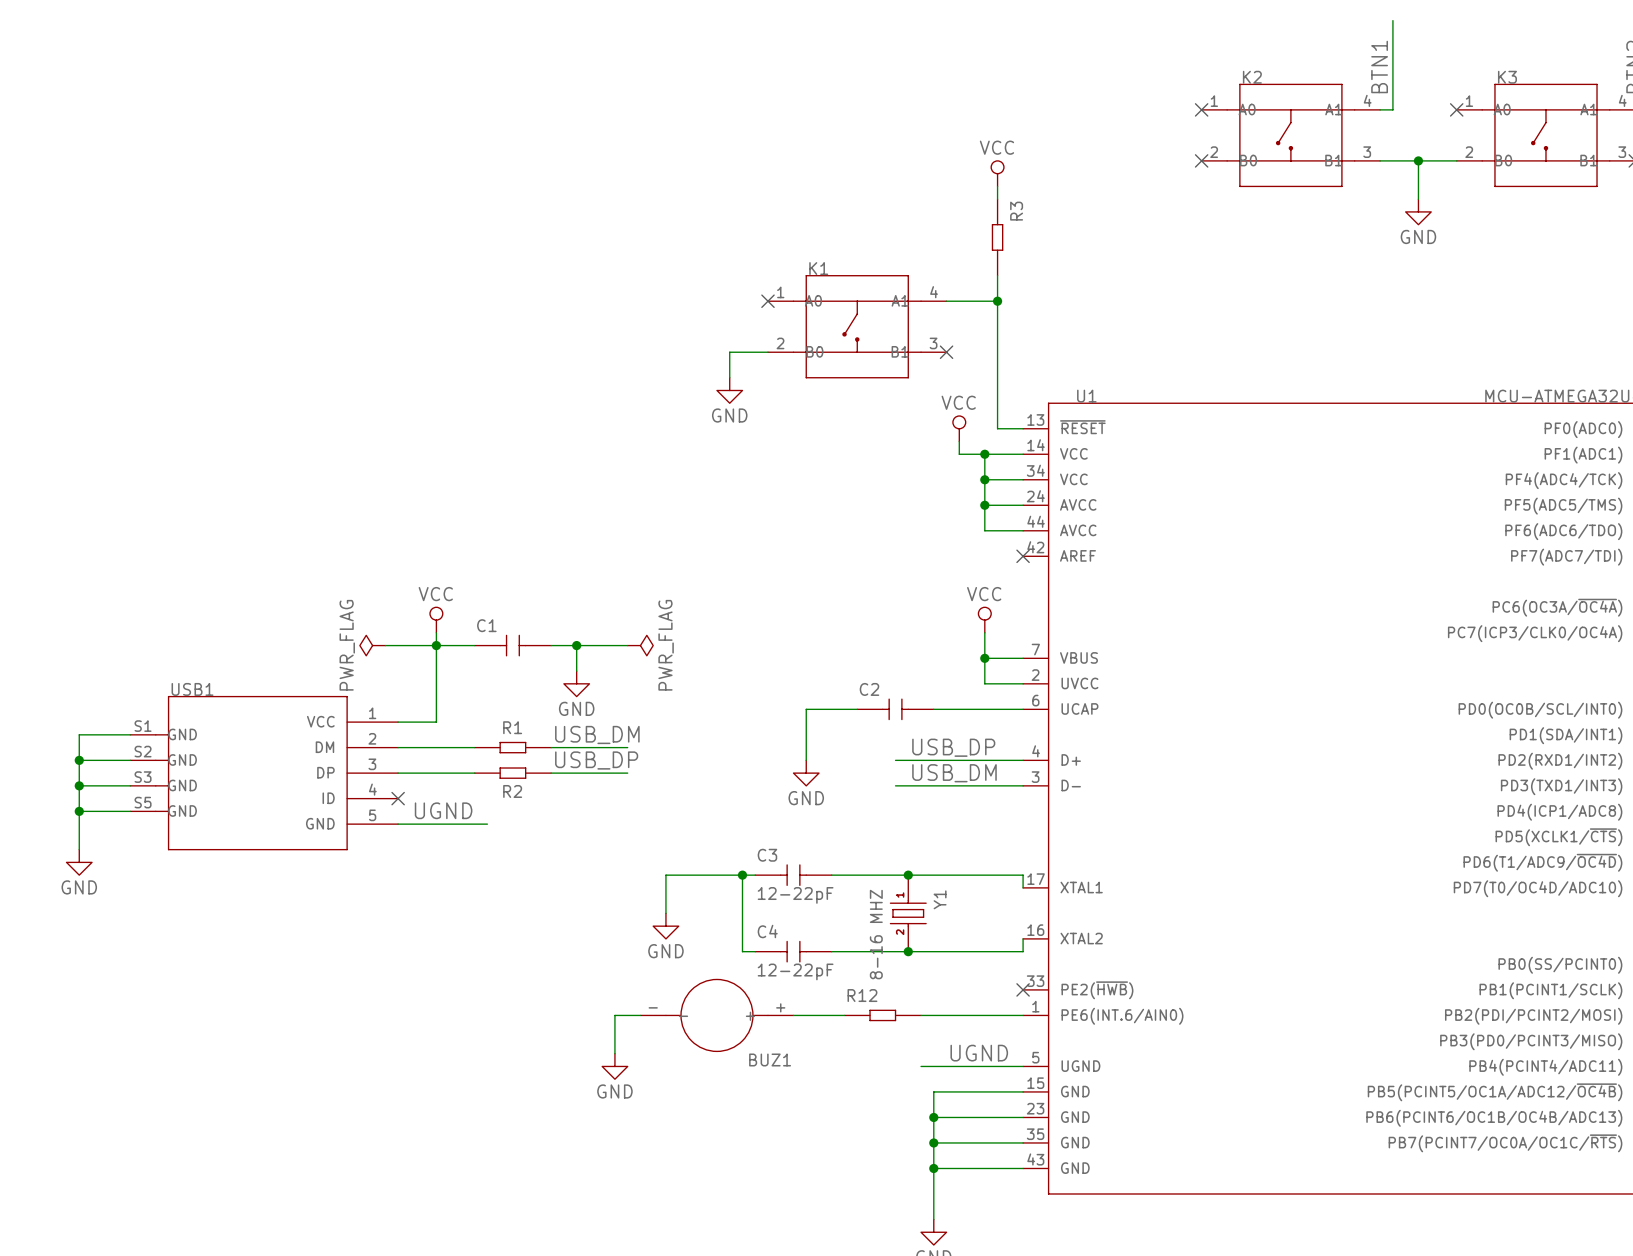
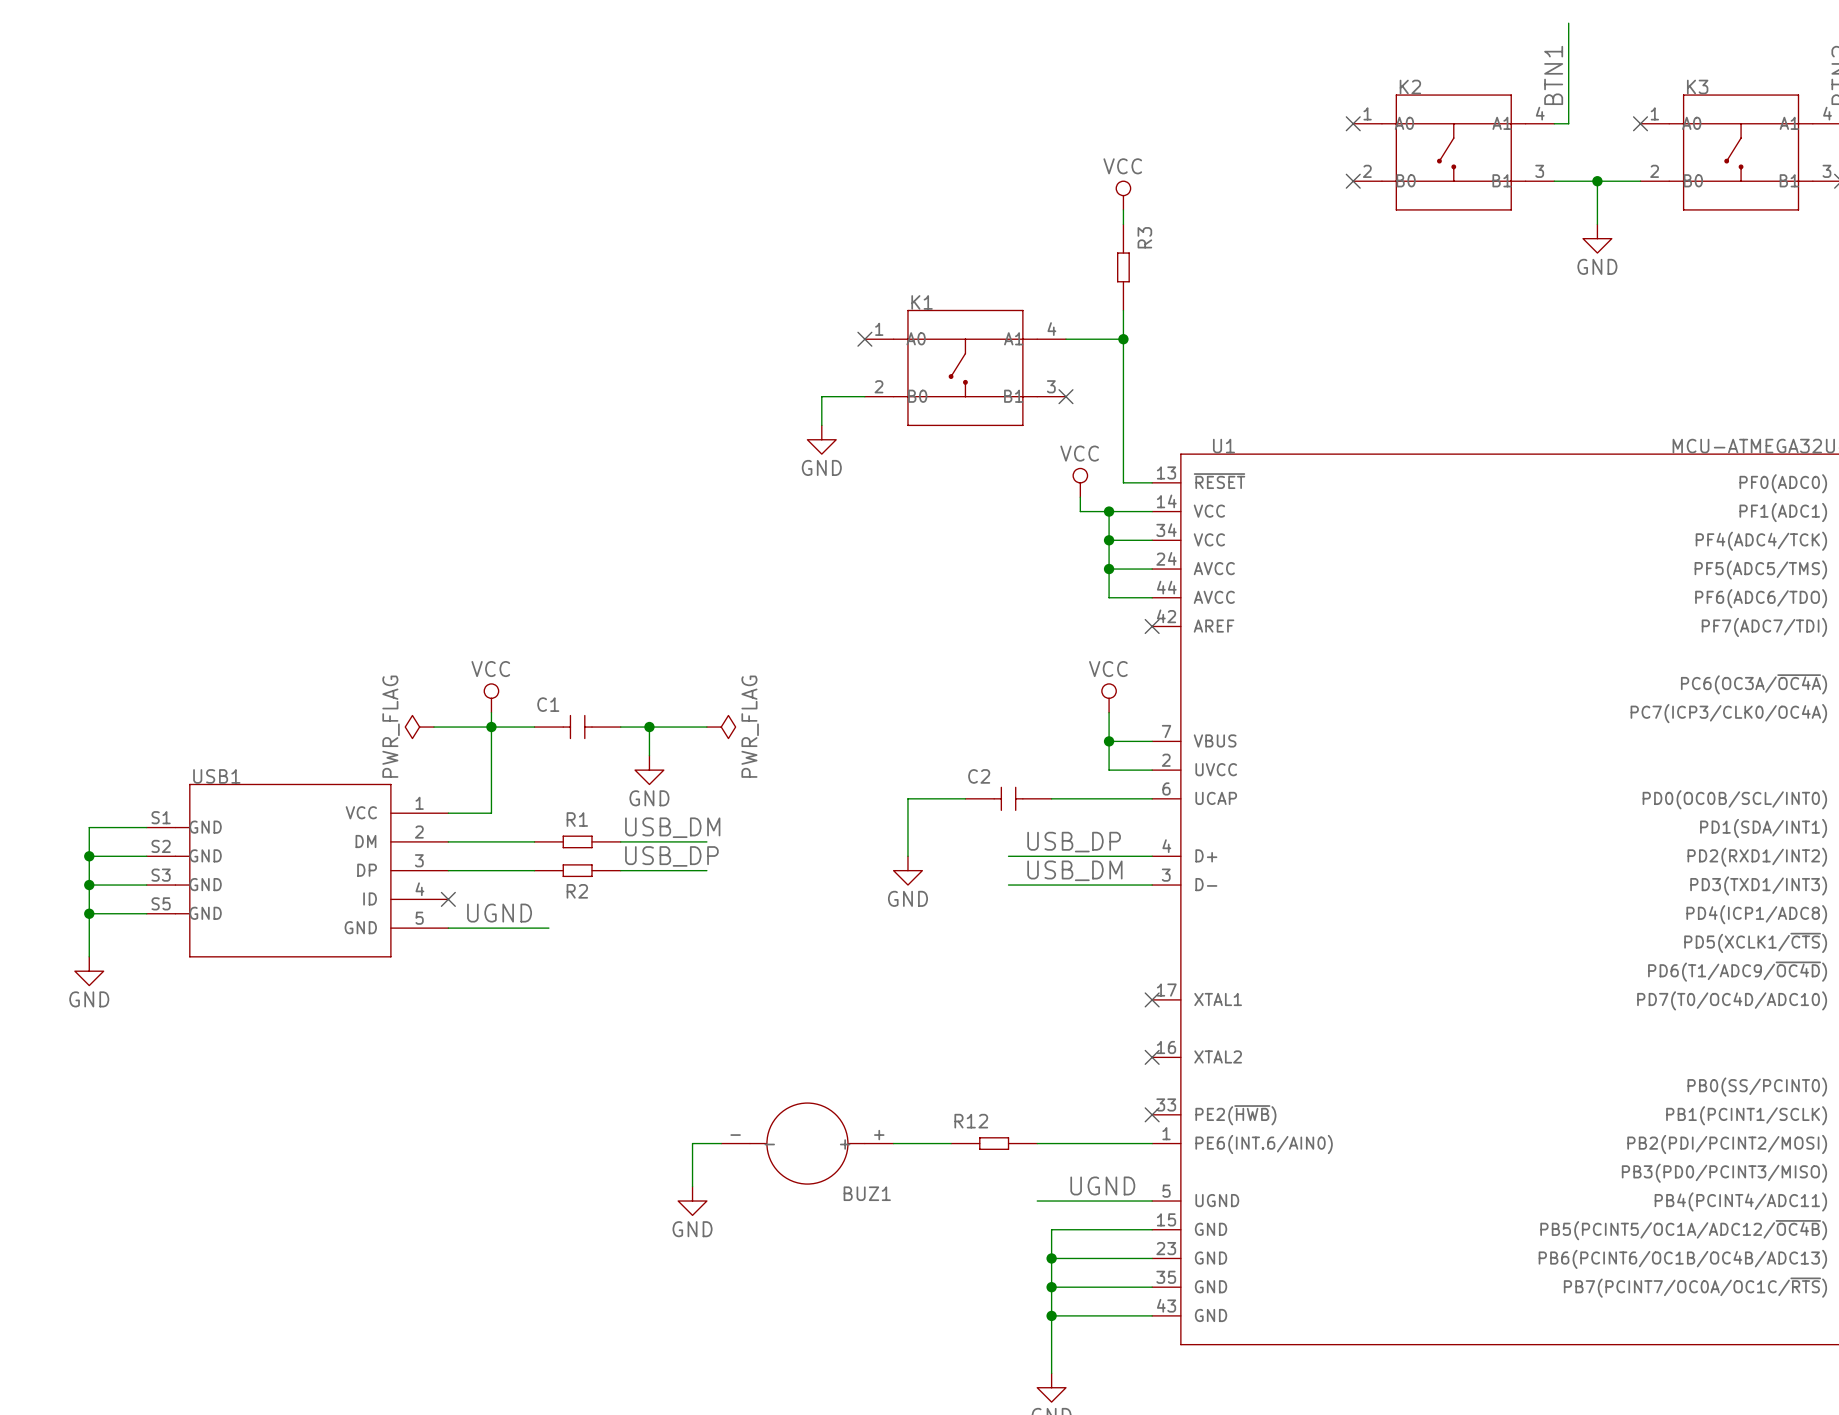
wire: (742, 875) (742, 951) (755, 951) -> none
junction: (742, 875) -> none
wire: (755, 875) (665, 875) (665, 913) -> none
C3: 12-22pF (793, 875) -> none
wire: (831, 875) (1023, 875) (1023, 887) -> none
junction: (908, 875) -> none
no-connect mark: none -> (1152, 999)
Y1: 8-16 MHZ (908, 913) -> none
power symbol: GND (665, 926) -> none
wire: (1023, 938) (1023, 951) (831, 951) -> none
no-connect mark: none -> (1152, 1057)
C4: 12-22pF (793, 951) -> none
junction: (908, 951) -> none

